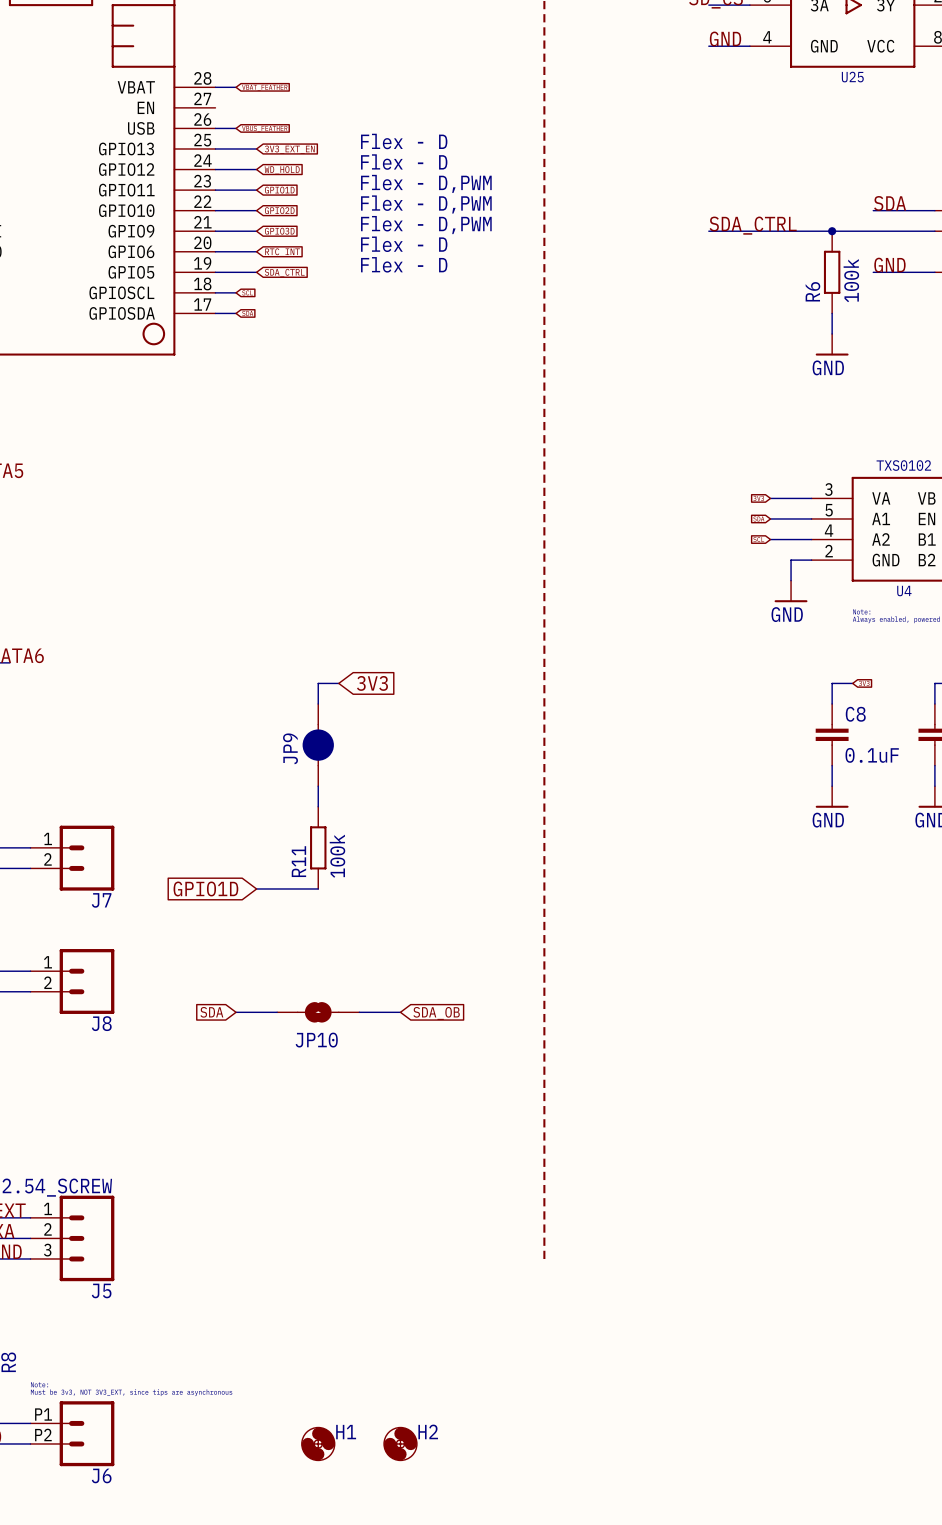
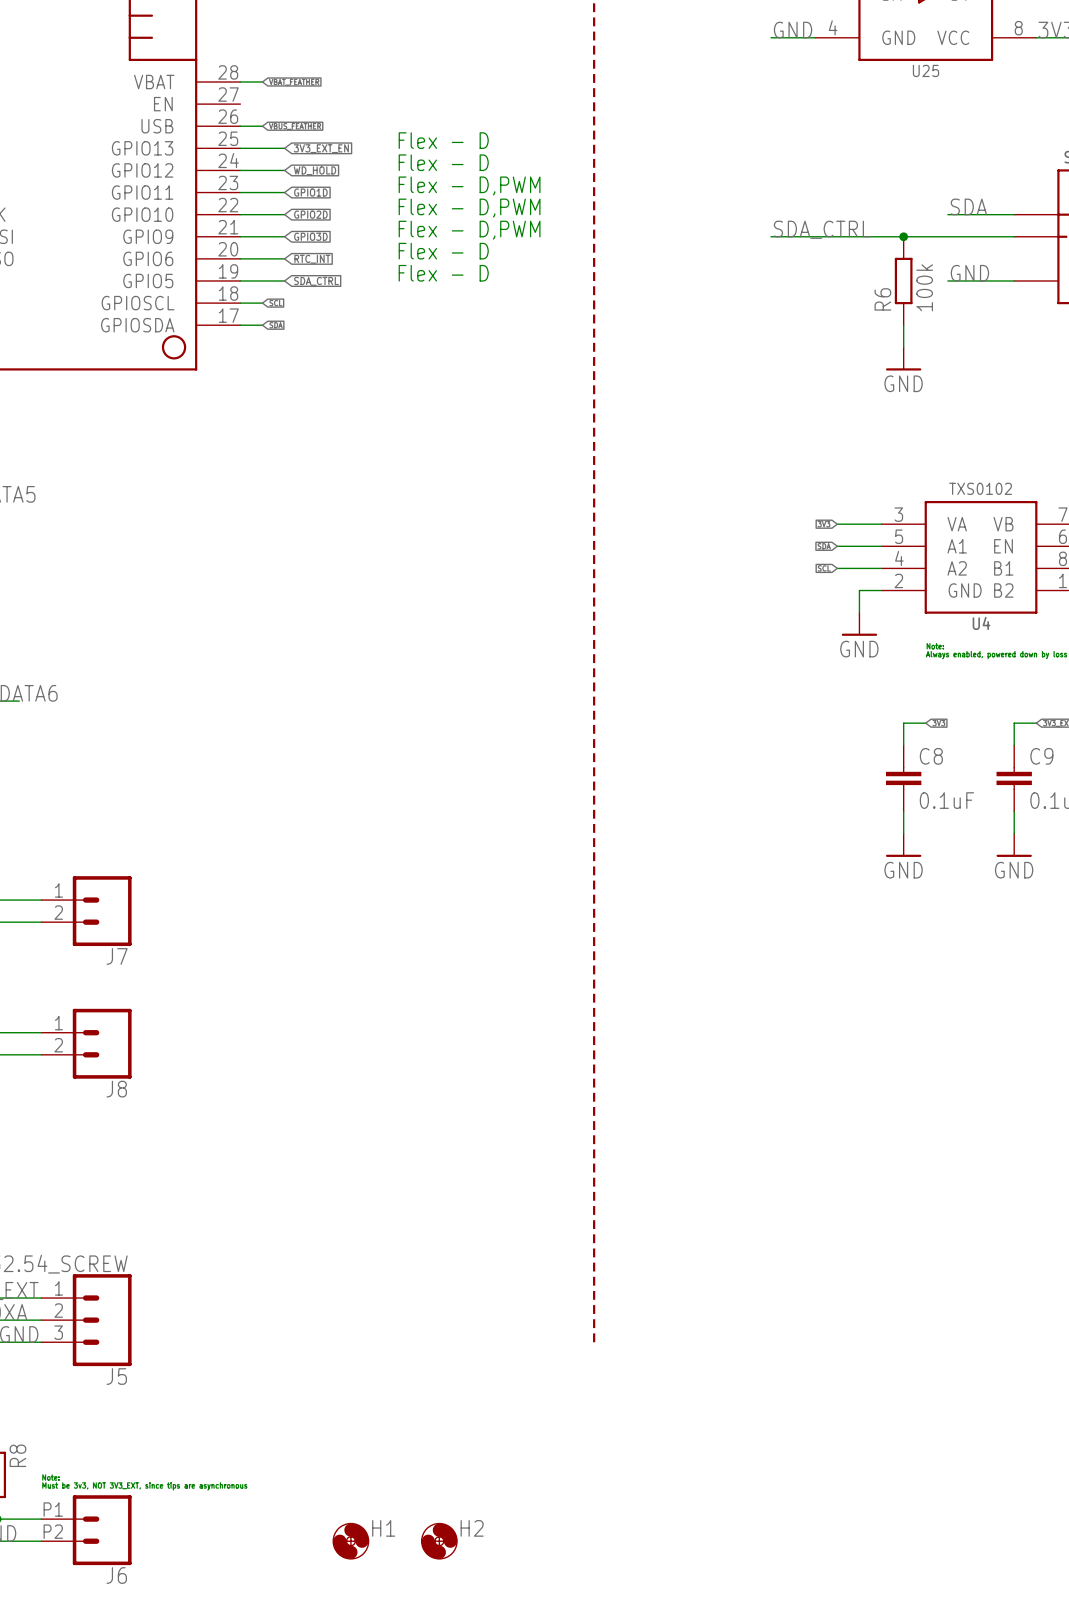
wire: (338, 683) (318, 683) (318, 703) -> none
global label: 3V3 (372, 683) -> none
JP9: (318, 745) -> none
wire: (318, 786) (318, 806) -> none
R11: 100k (318, 847) -> none
global label: GPIO1D (205, 888) -> none
wire: (256, 888) (318, 888) -> none
global label: SDA (211, 1012) -> none
wire: (236, 1012) (277, 1012) -> none
JP10: (318, 1012) -> none
wire: (359, 1012) (400, 1012) -> none
global label: SDA_OB (436, 1013) -> none

